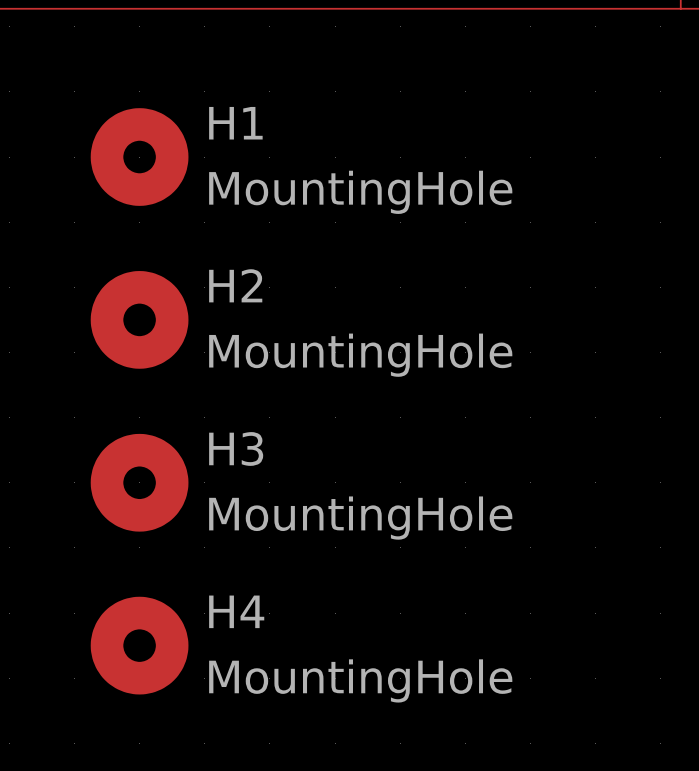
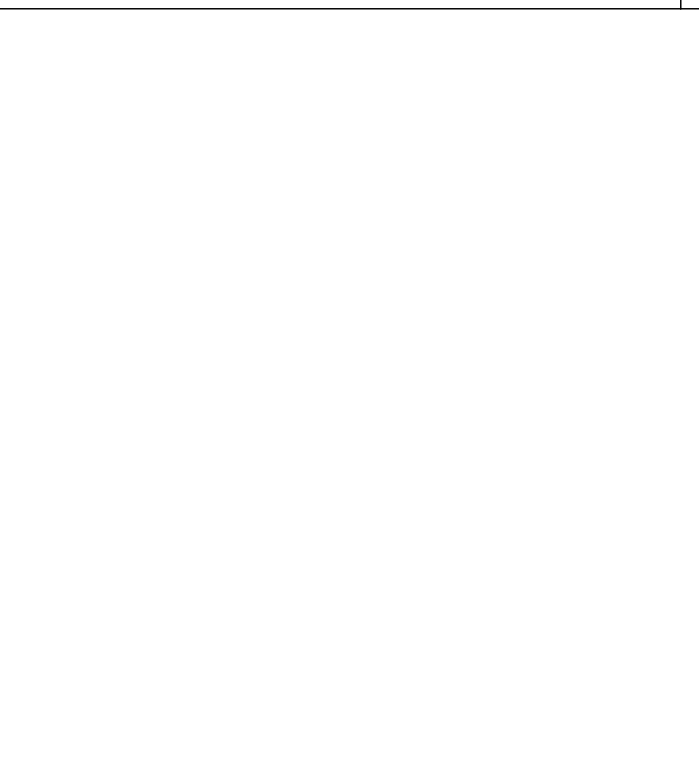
H1: MountingHole (139, 157) -> none
H2: MountingHole (139, 319) -> none
H3: MountingHole (139, 482) -> none
H4: MountingHole (139, 645) -> none

